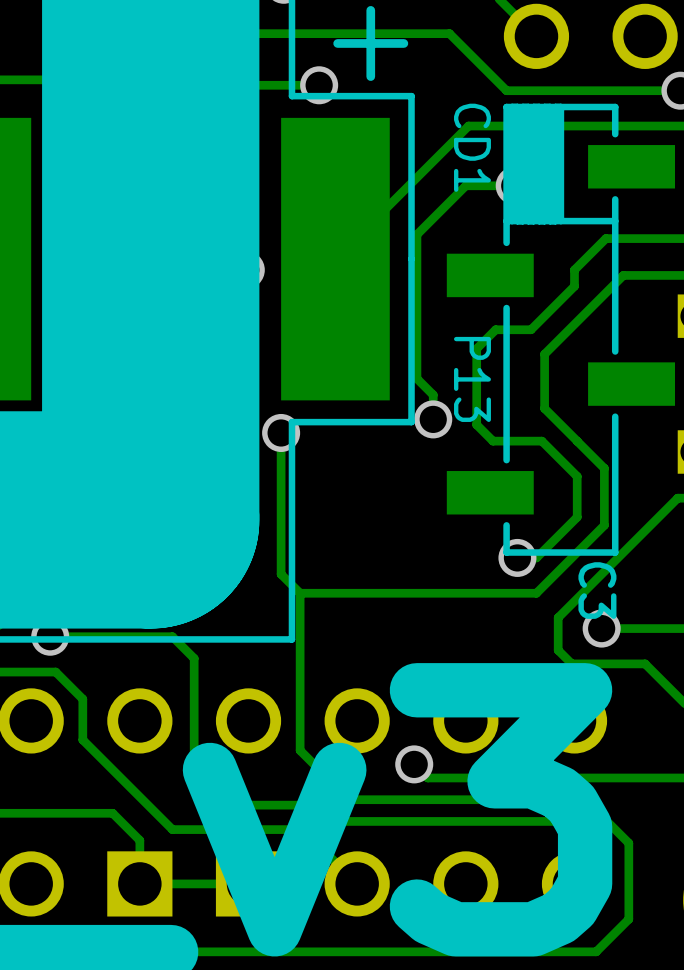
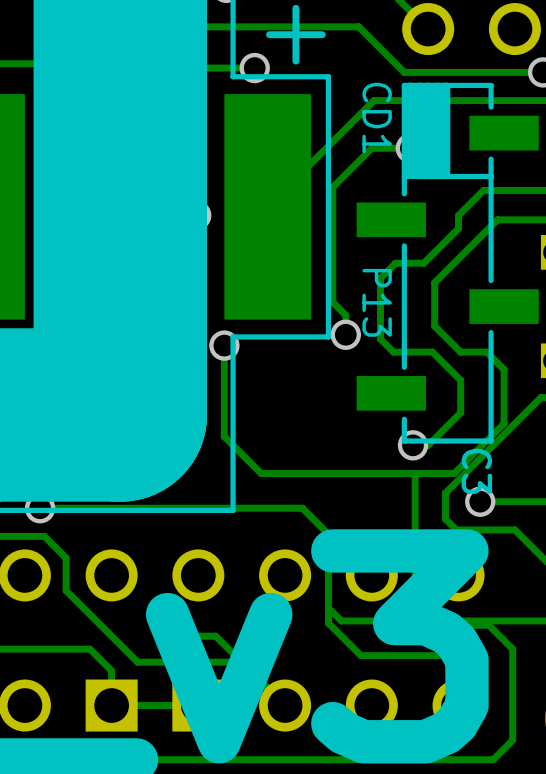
track: (577, 441) (604, 468) (604, 525) (536, 593) -> (460, 352) (486, 352) (504, 369) (504, 423) (454, 473) (428, 473)
track: (281, 547) (281, 574) (300, 593) -> (224, 436) (261, 473)
track: (300, 593) (300, 750) (349, 799) (585, 799) (628, 843) (628, 919) (596, 951) -> (415, 473) (415, 610) (430, 625) (488, 625) (512, 649) (512, 740) (493, 759) (475, 759)
track: (327, 593) (300, 593) -> none
track: (172, 636) (194, 658) (194, 777) -> (137, 508) (302, 508) (328, 534) (328, 623) (360, 655)
via: (414, 764) -> none
track: (213, 796) (221, 805) (308, 805) (324, 821) (452, 821) -> (170, 636) (215, 636) (241, 662)

